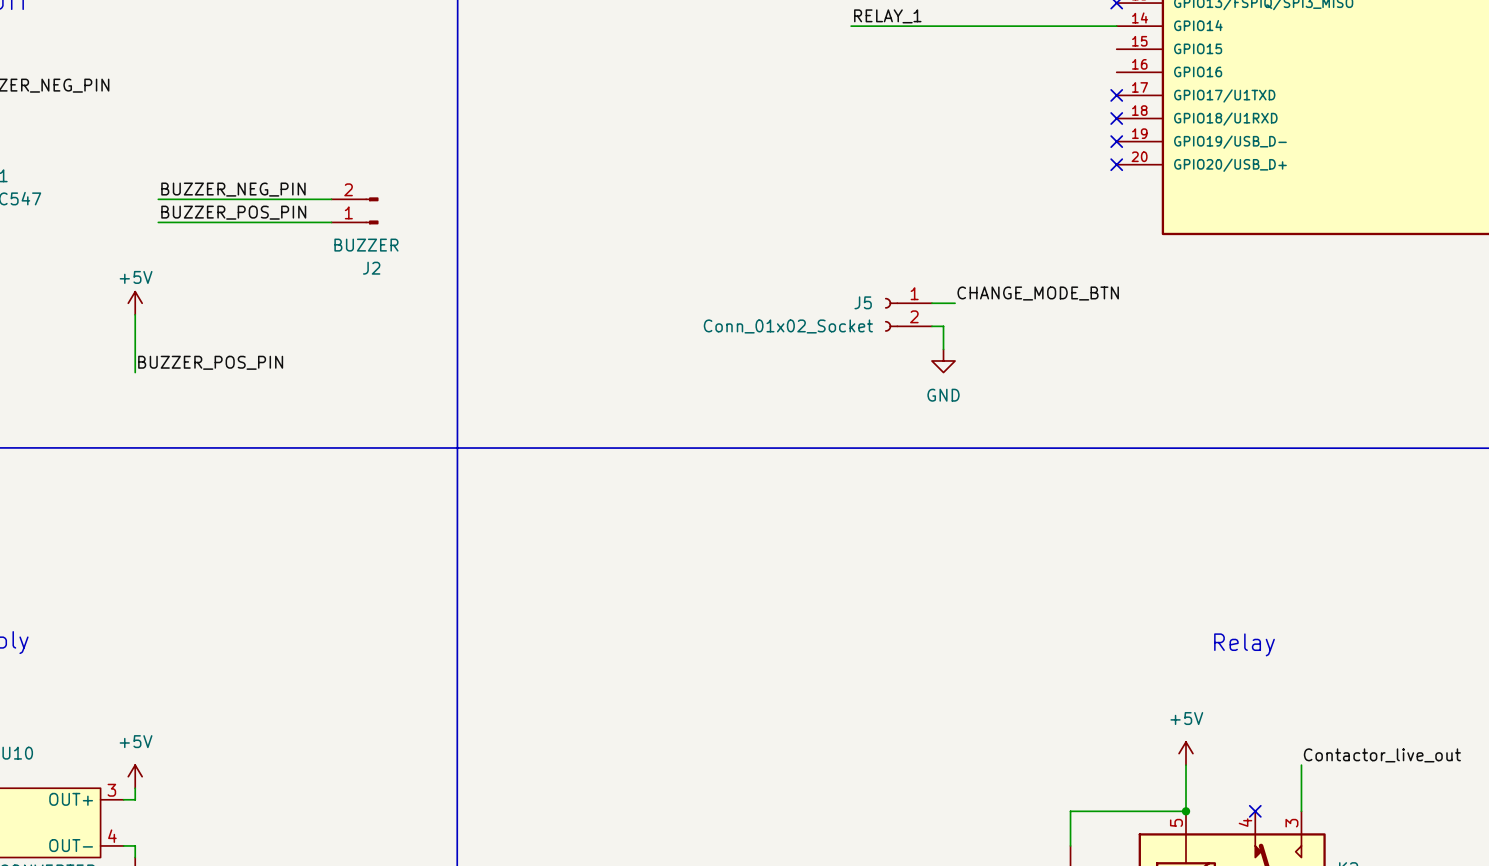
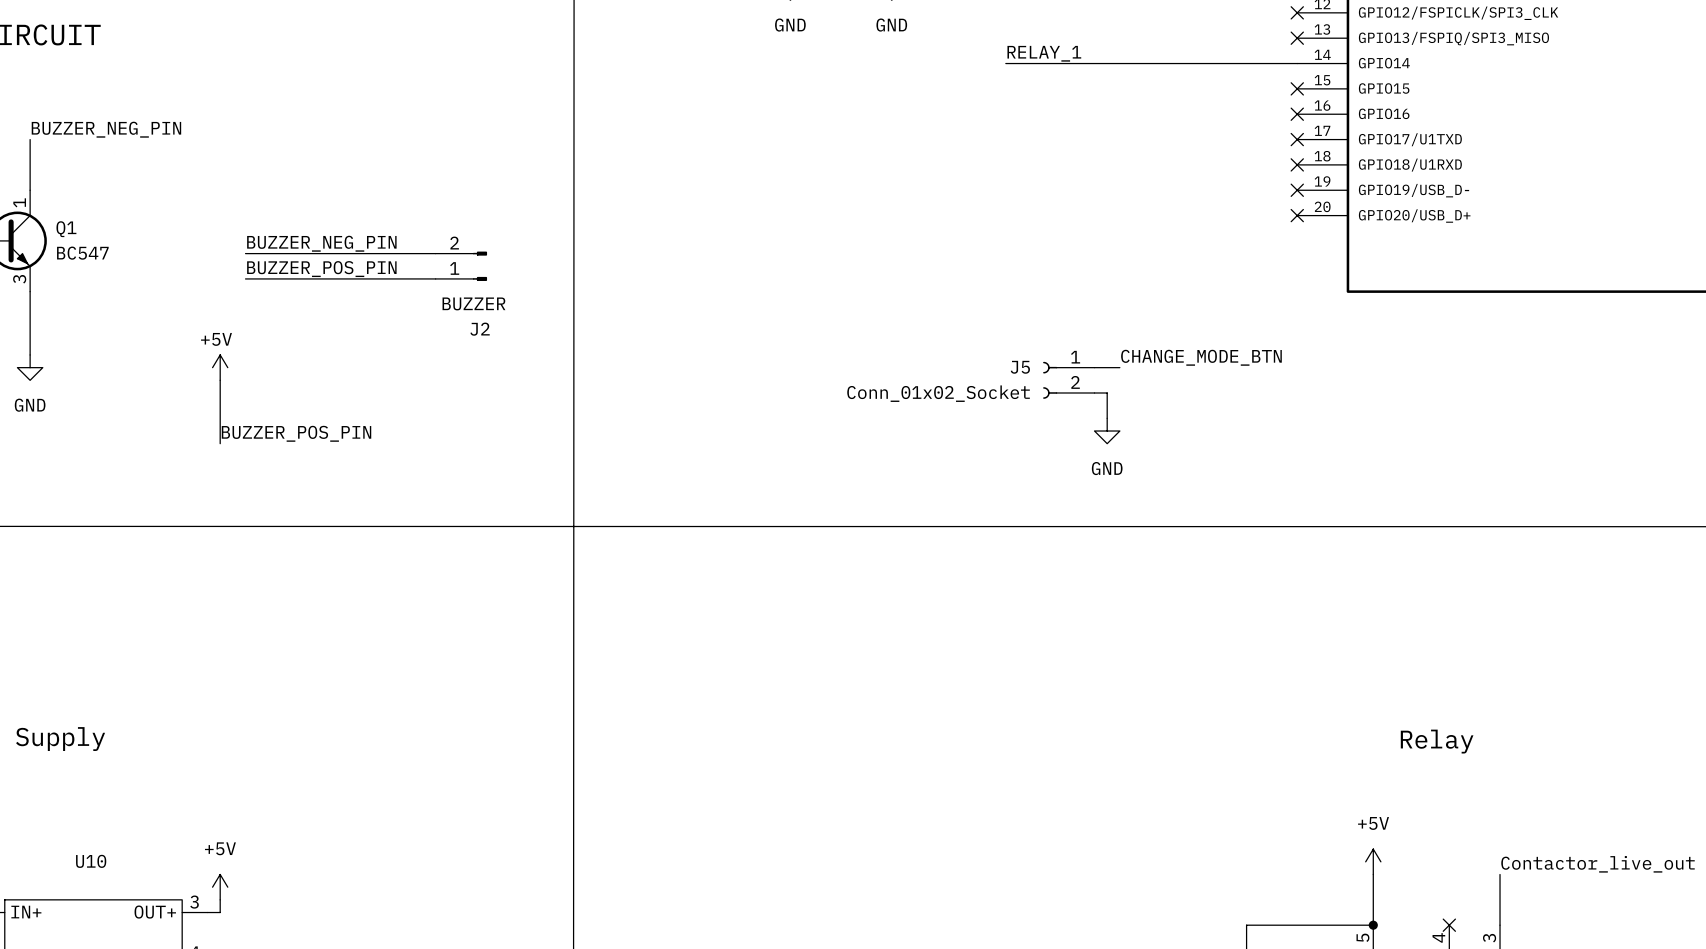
no-connect mark: none -> (1297, 88)
no-connect mark: none -> (1297, 114)

